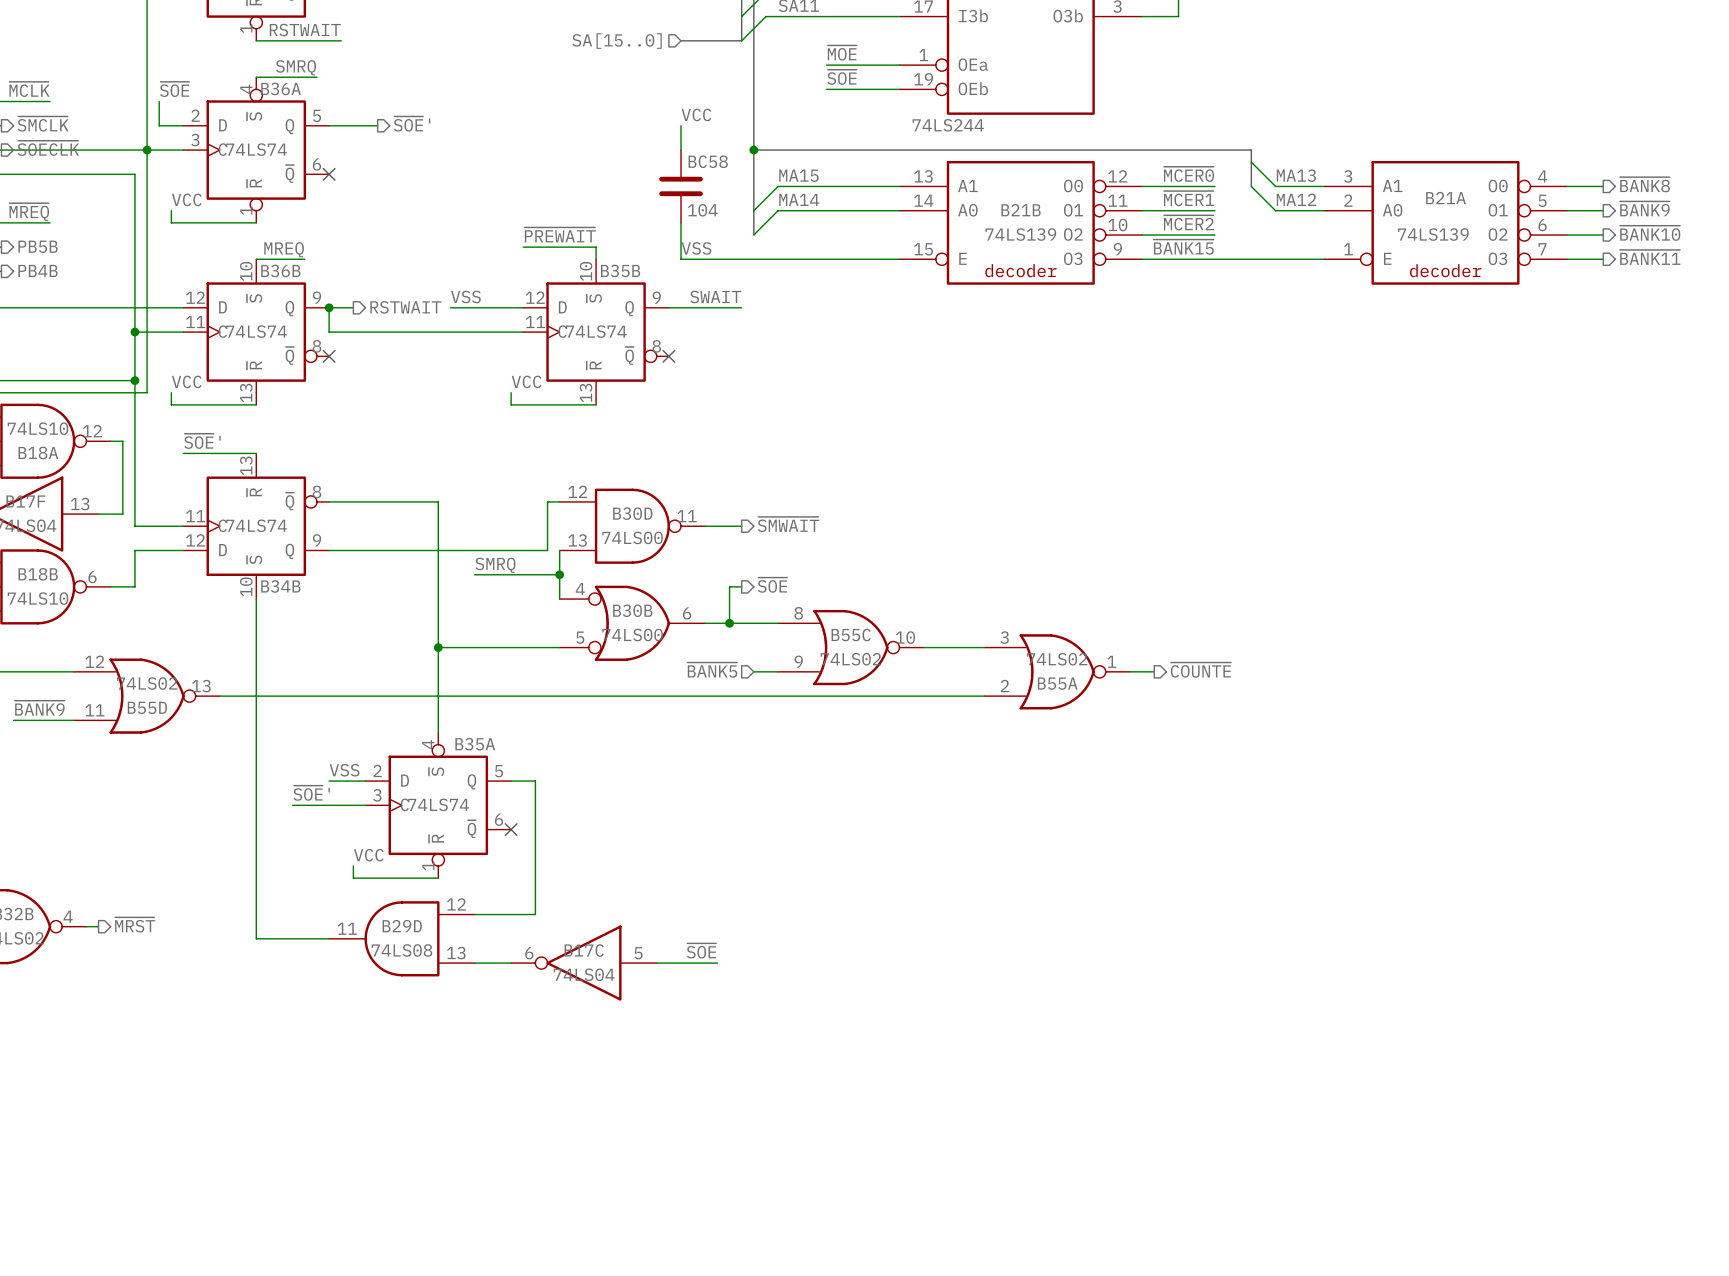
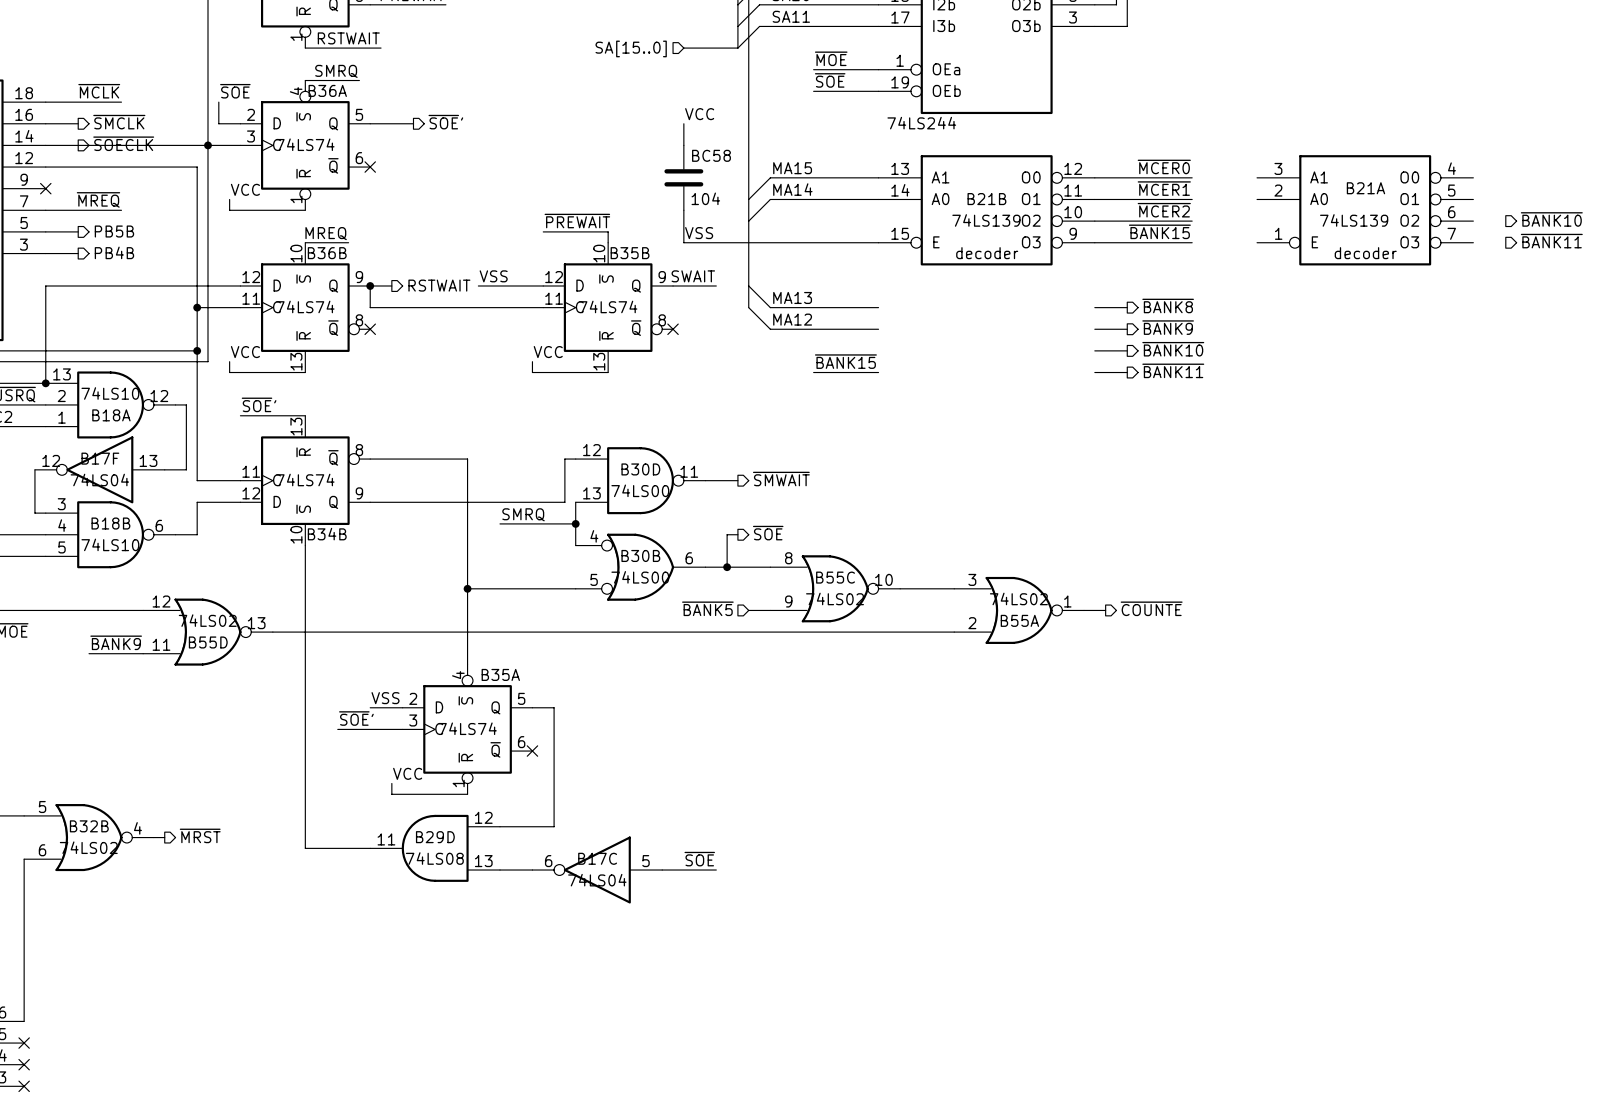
bus: (753, 150) (1251, 150) (1251, 186) -> none
junction: (753, 150) -> none
wire: (1251, 162) (1275, 186) (1324, 186) -> none
label position: ~{MCER0} (1188, 174) -> ~{MCER0} (1164, 166)
label: MA13 (1296, 175) -> none
hierarchical label: ~{BANK8} (1644, 184) -> none
wire: (1251, 186) (1275, 210) (1324, 210) -> (1192, 177) (1159, 177)
wire: (1566, 186) (1603, 186) -> none
label position: ~{MCER1} (1189, 198) -> ~{MCER1} (1164, 188)
label: MA12 (1296, 199) -> none
hierarchical label: ~{BANK9} (1644, 208) -> none
wire: none -> (1159, 199) (1192, 199)
wire: (1566, 210) (1603, 210) -> none
label position: ~{MCER2} (1188, 222) -> ~{MCER2} (1164, 210)
bus: none -> (748, 221) (748, 307)
wire: none -> (1159, 221) (1192, 221)
wire: (1566, 235) (1603, 235) -> none
label position: ~{BANK15} (1183, 247) -> ~{BANK15} (1159, 231)
wire: (1251, 259) (1324, 259) -> none
wire: (1566, 259) (1603, 259) -> none
label position: SWAIT (715, 296) -> SWAIT (693, 276)
wire: (717, 307) (741, 307) -> none
wire: none -> (748, 286) (770, 307) (878, 307)
label: none -> MA13 (792, 297)
hierarchical label: none -> ~{BANK8} (1168, 305)
wire: none -> (748, 307) (770, 329) (878, 329)
wire: none -> (1094, 307) (1127, 307)
label: none -> MA12 (792, 319)
hierarchical label: none -> ~{BANK9} (1168, 327)
wire: none -> (1094, 329) (1127, 329)
hierarchical label: none -> ~{BANK10} (1173, 349)
wire: none -> (1094, 350) (1127, 350)
label: none -> ~{BANK15} (845, 361)
hierarchical label: none -> ~{BANK11} (1173, 370)
wire: none -> (813, 372) (878, 372)
wire: none -> (1094, 372) (1127, 372)

